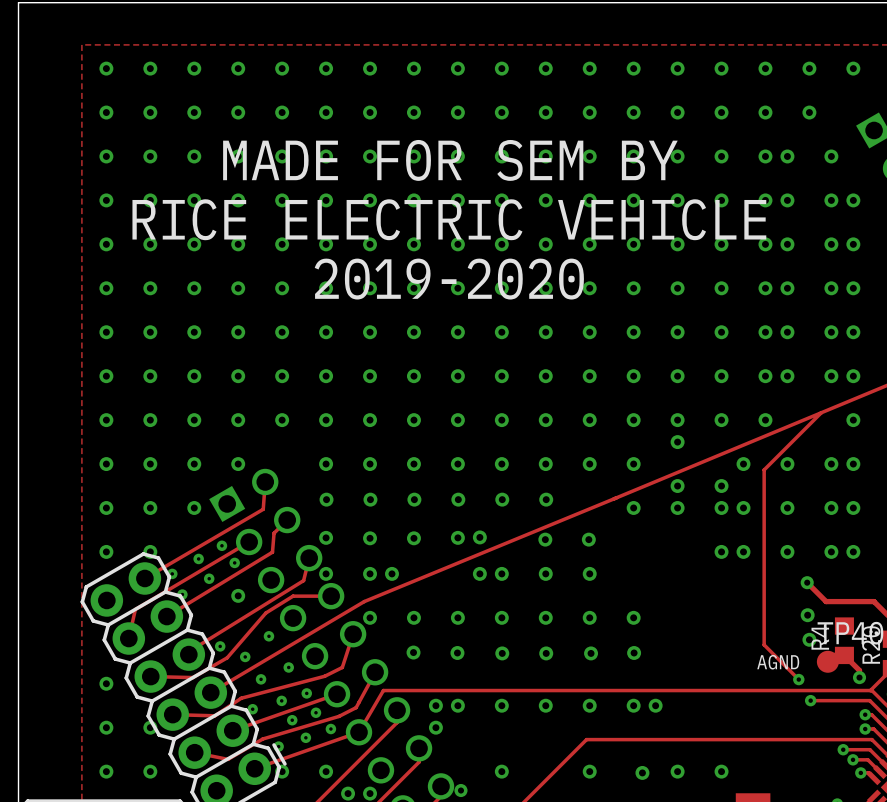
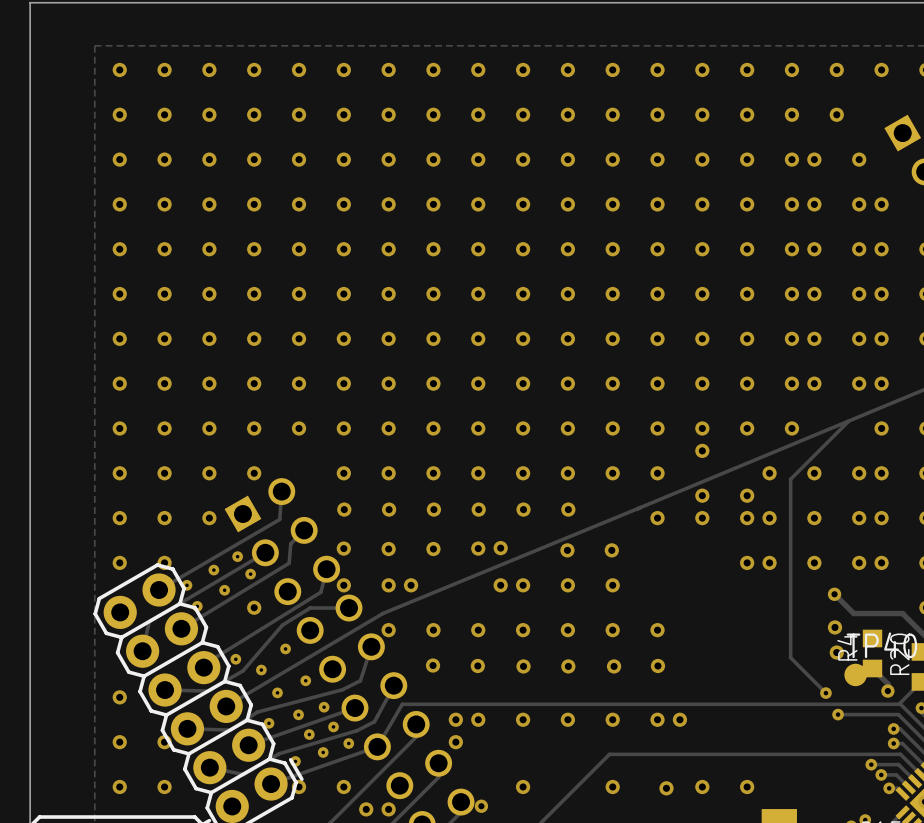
text: MADE FOR SEM BY (450, 160) -> none
text: RICE ELECTRIC VEHICLE (449, 219) -> none
text: 2019-2020 (449, 279) -> none
text: AGND (778, 662) -> none

